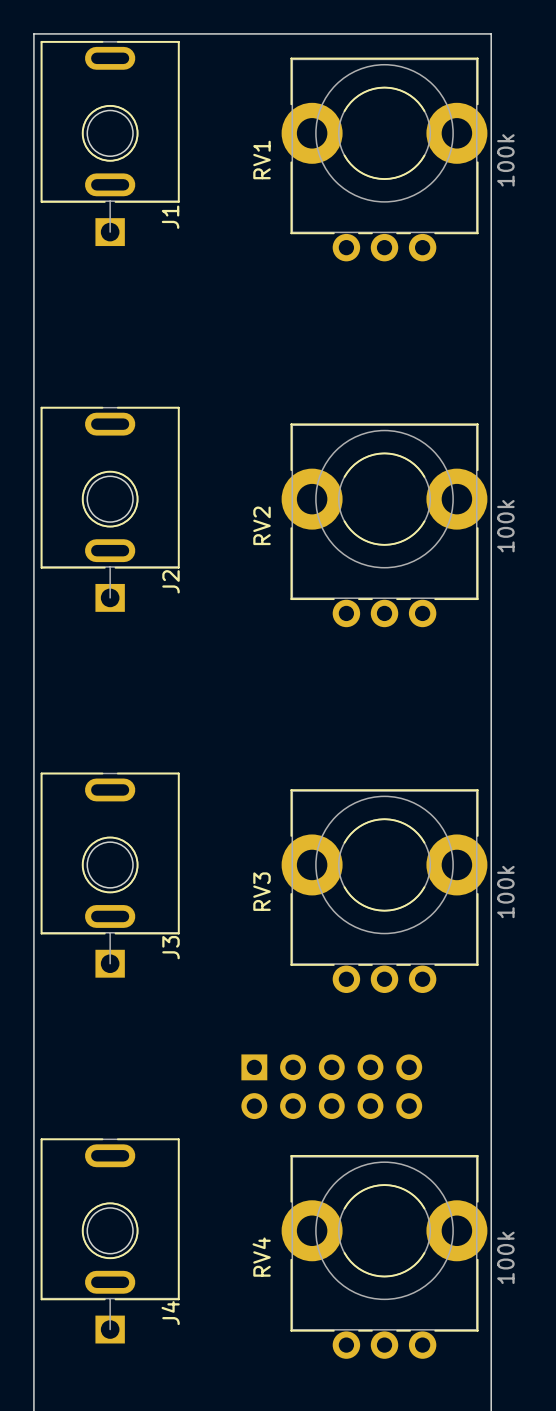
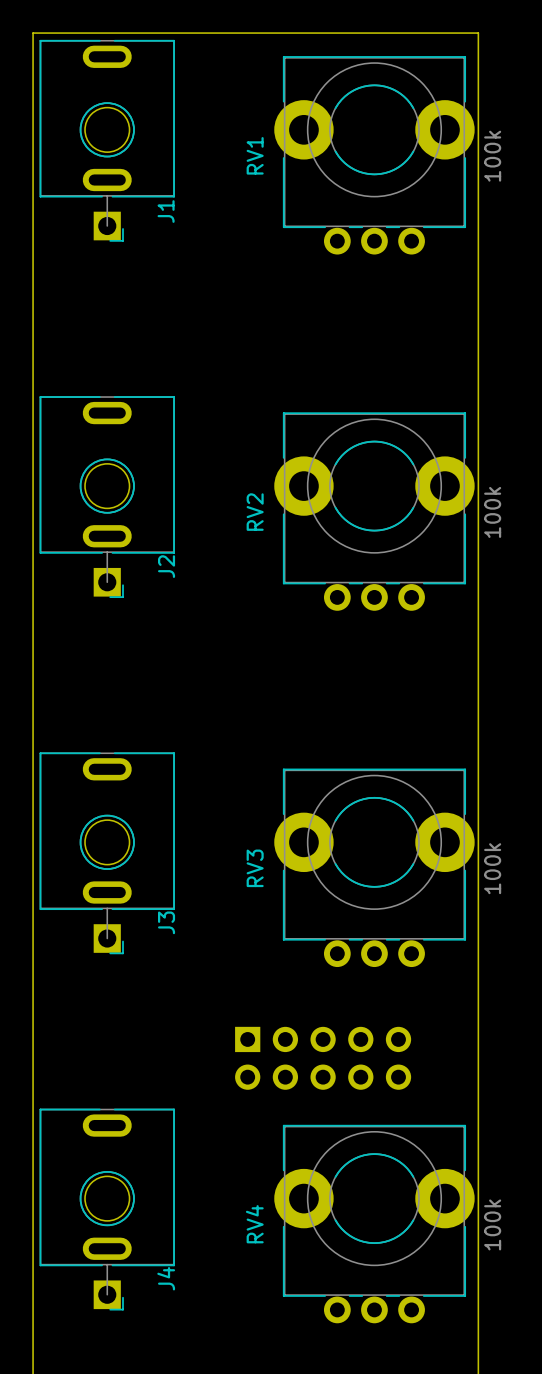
J1 footprint: [40, 40, 180, 247] -> [39, 39, 175, 242]
J2 footprint: [40, 406, 180, 612] -> [39, 396, 175, 599]
J3 footprint: [40, 772, 180, 978] -> [39, 752, 175, 955]
J4 footprint: [40, 1138, 180, 1344] -> [39, 1108, 175, 1311]

